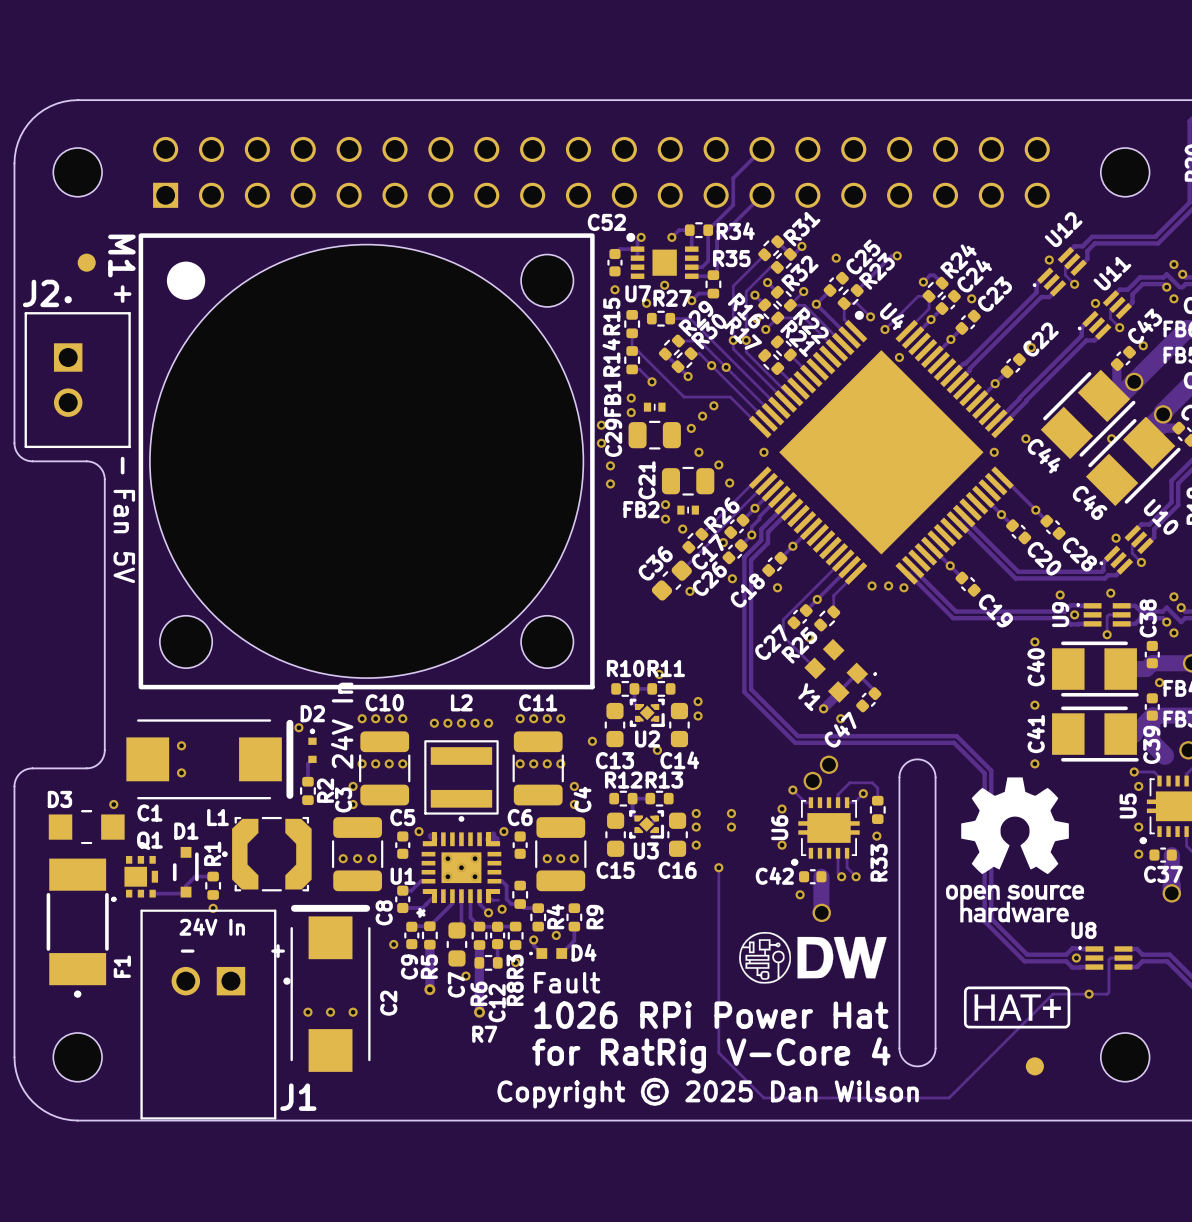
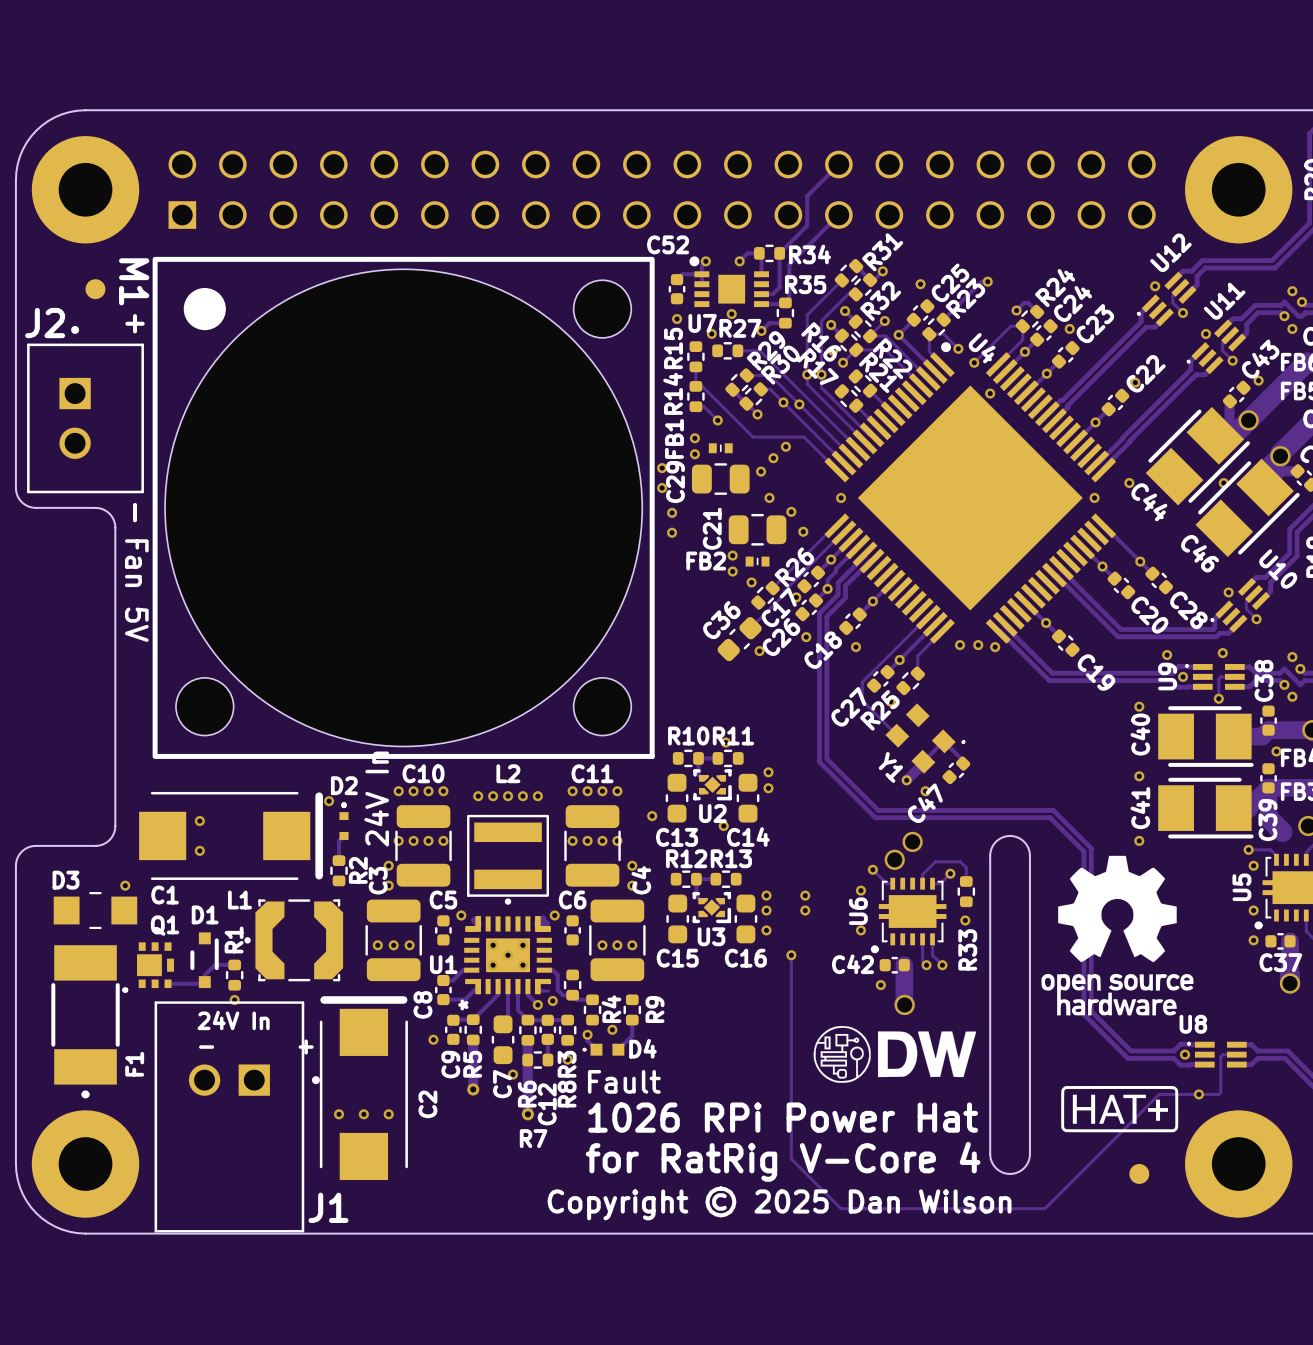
part footprint: [53, 147, 103, 197] -> [31, 136, 140, 244]
part footprint: [1100, 147, 1150, 197] -> [1185, 136, 1293, 244]
part footprint: [53, 1032, 103, 1082] -> [31, 1110, 140, 1218]
part footprint: [1100, 1032, 1150, 1082] -> [1185, 1110, 1293, 1218]

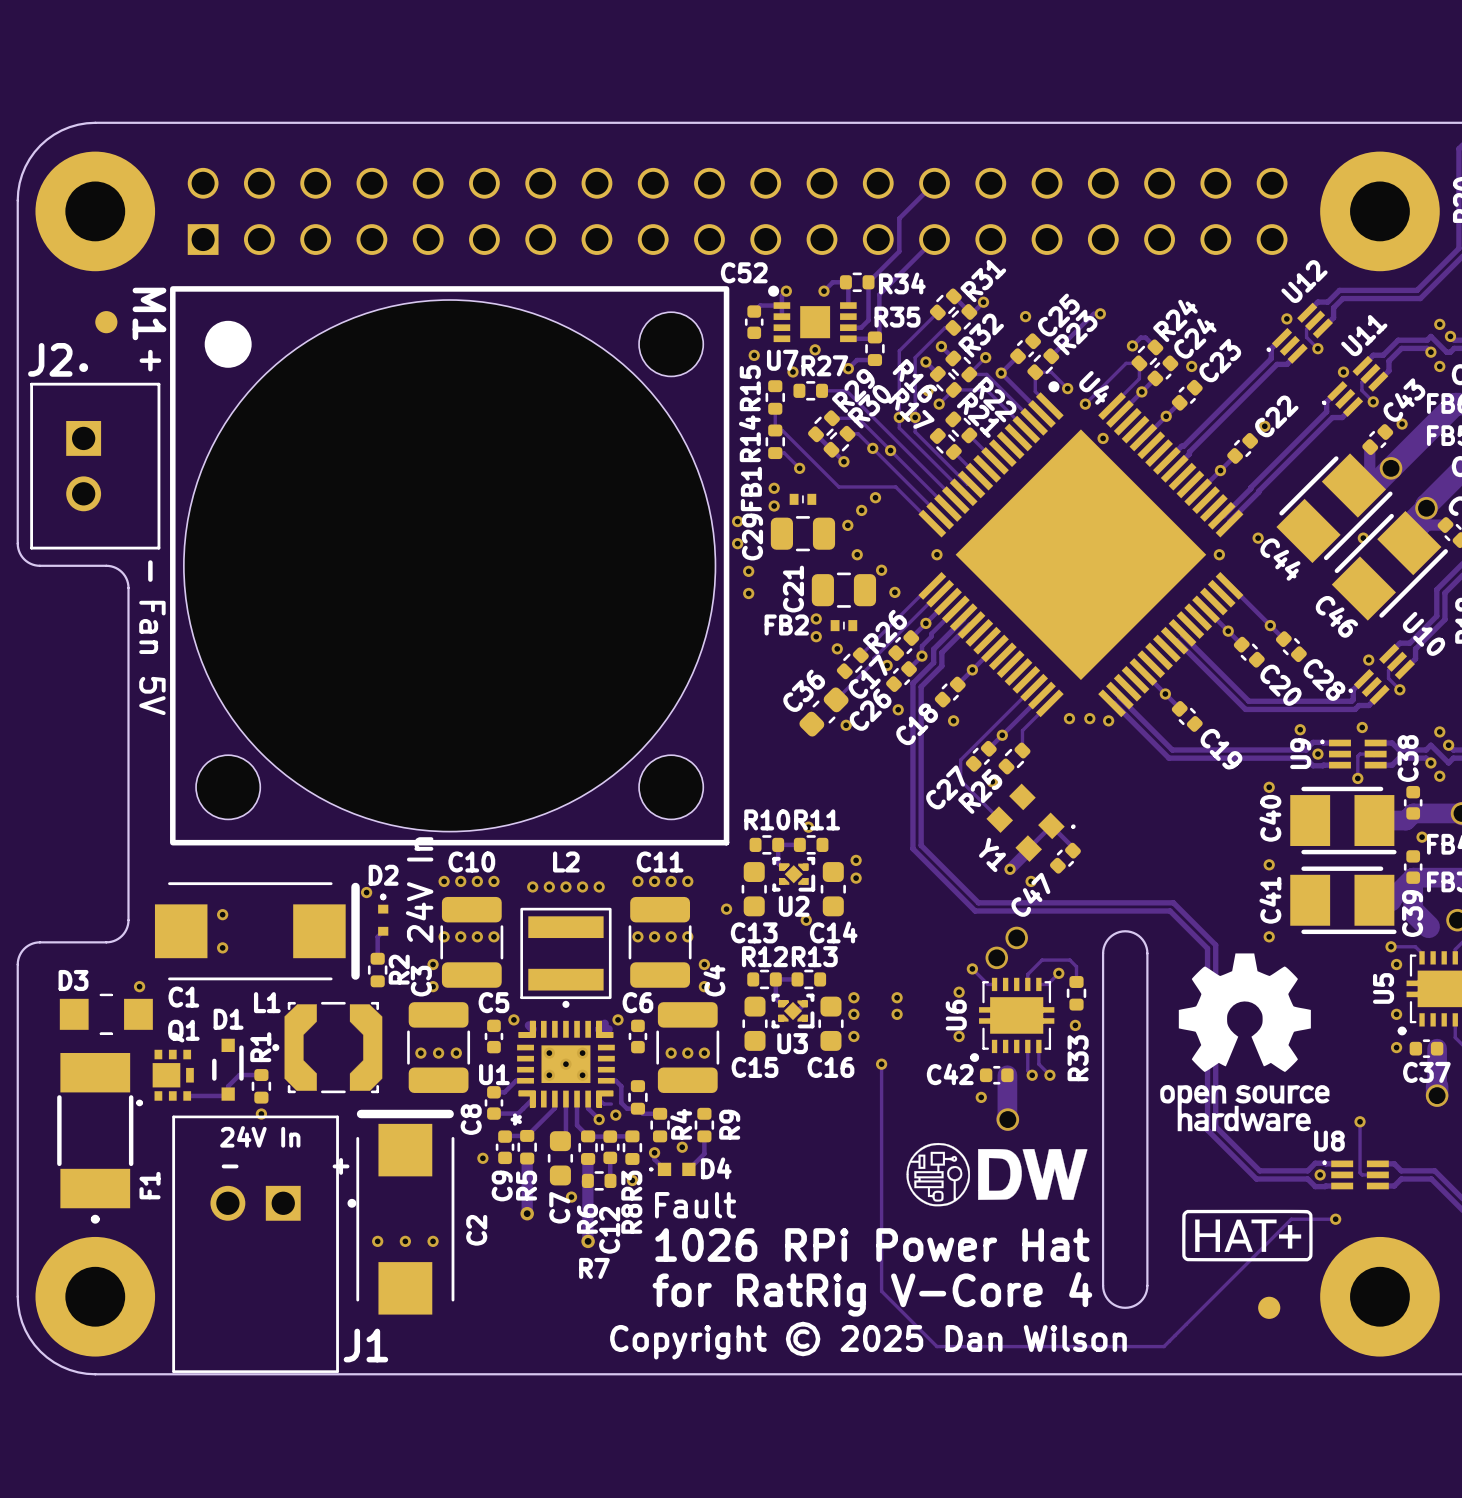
via: none -> (1360, 1121)
track: (1222, 1054) (1220, 1056) (1220, 1092) (1218, 1094) (1198, 1094) -> (1362, 1174) (1360, 1172) (1360, 1121)

